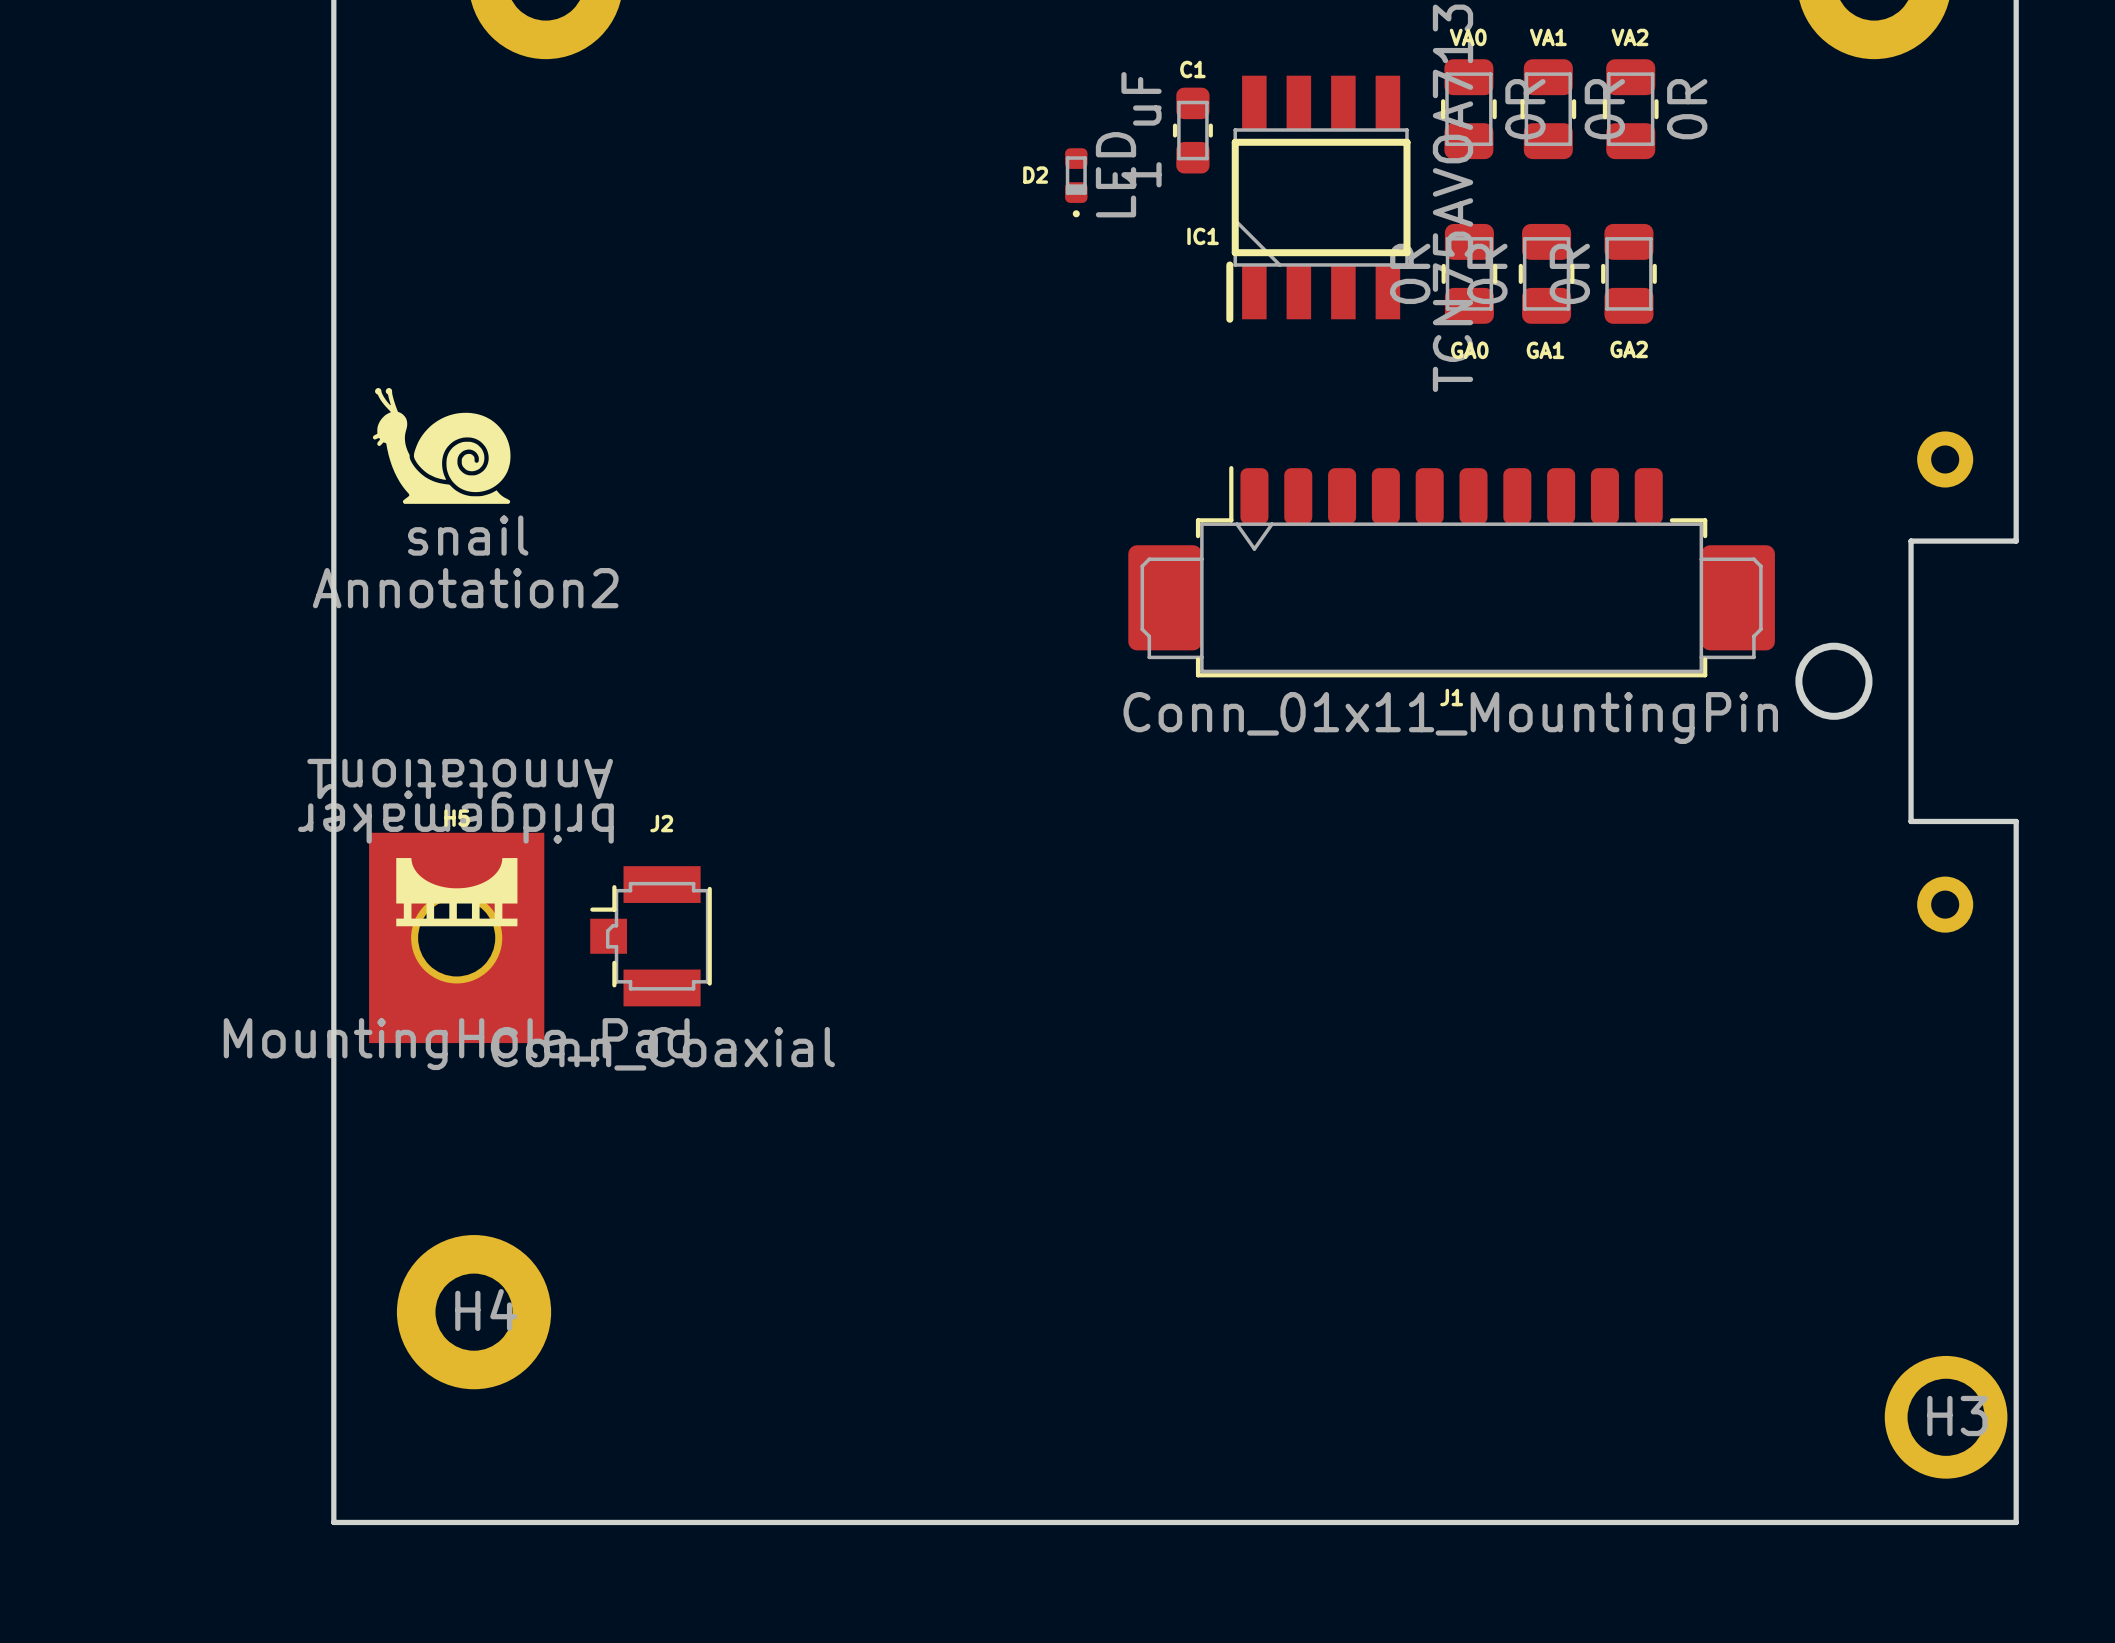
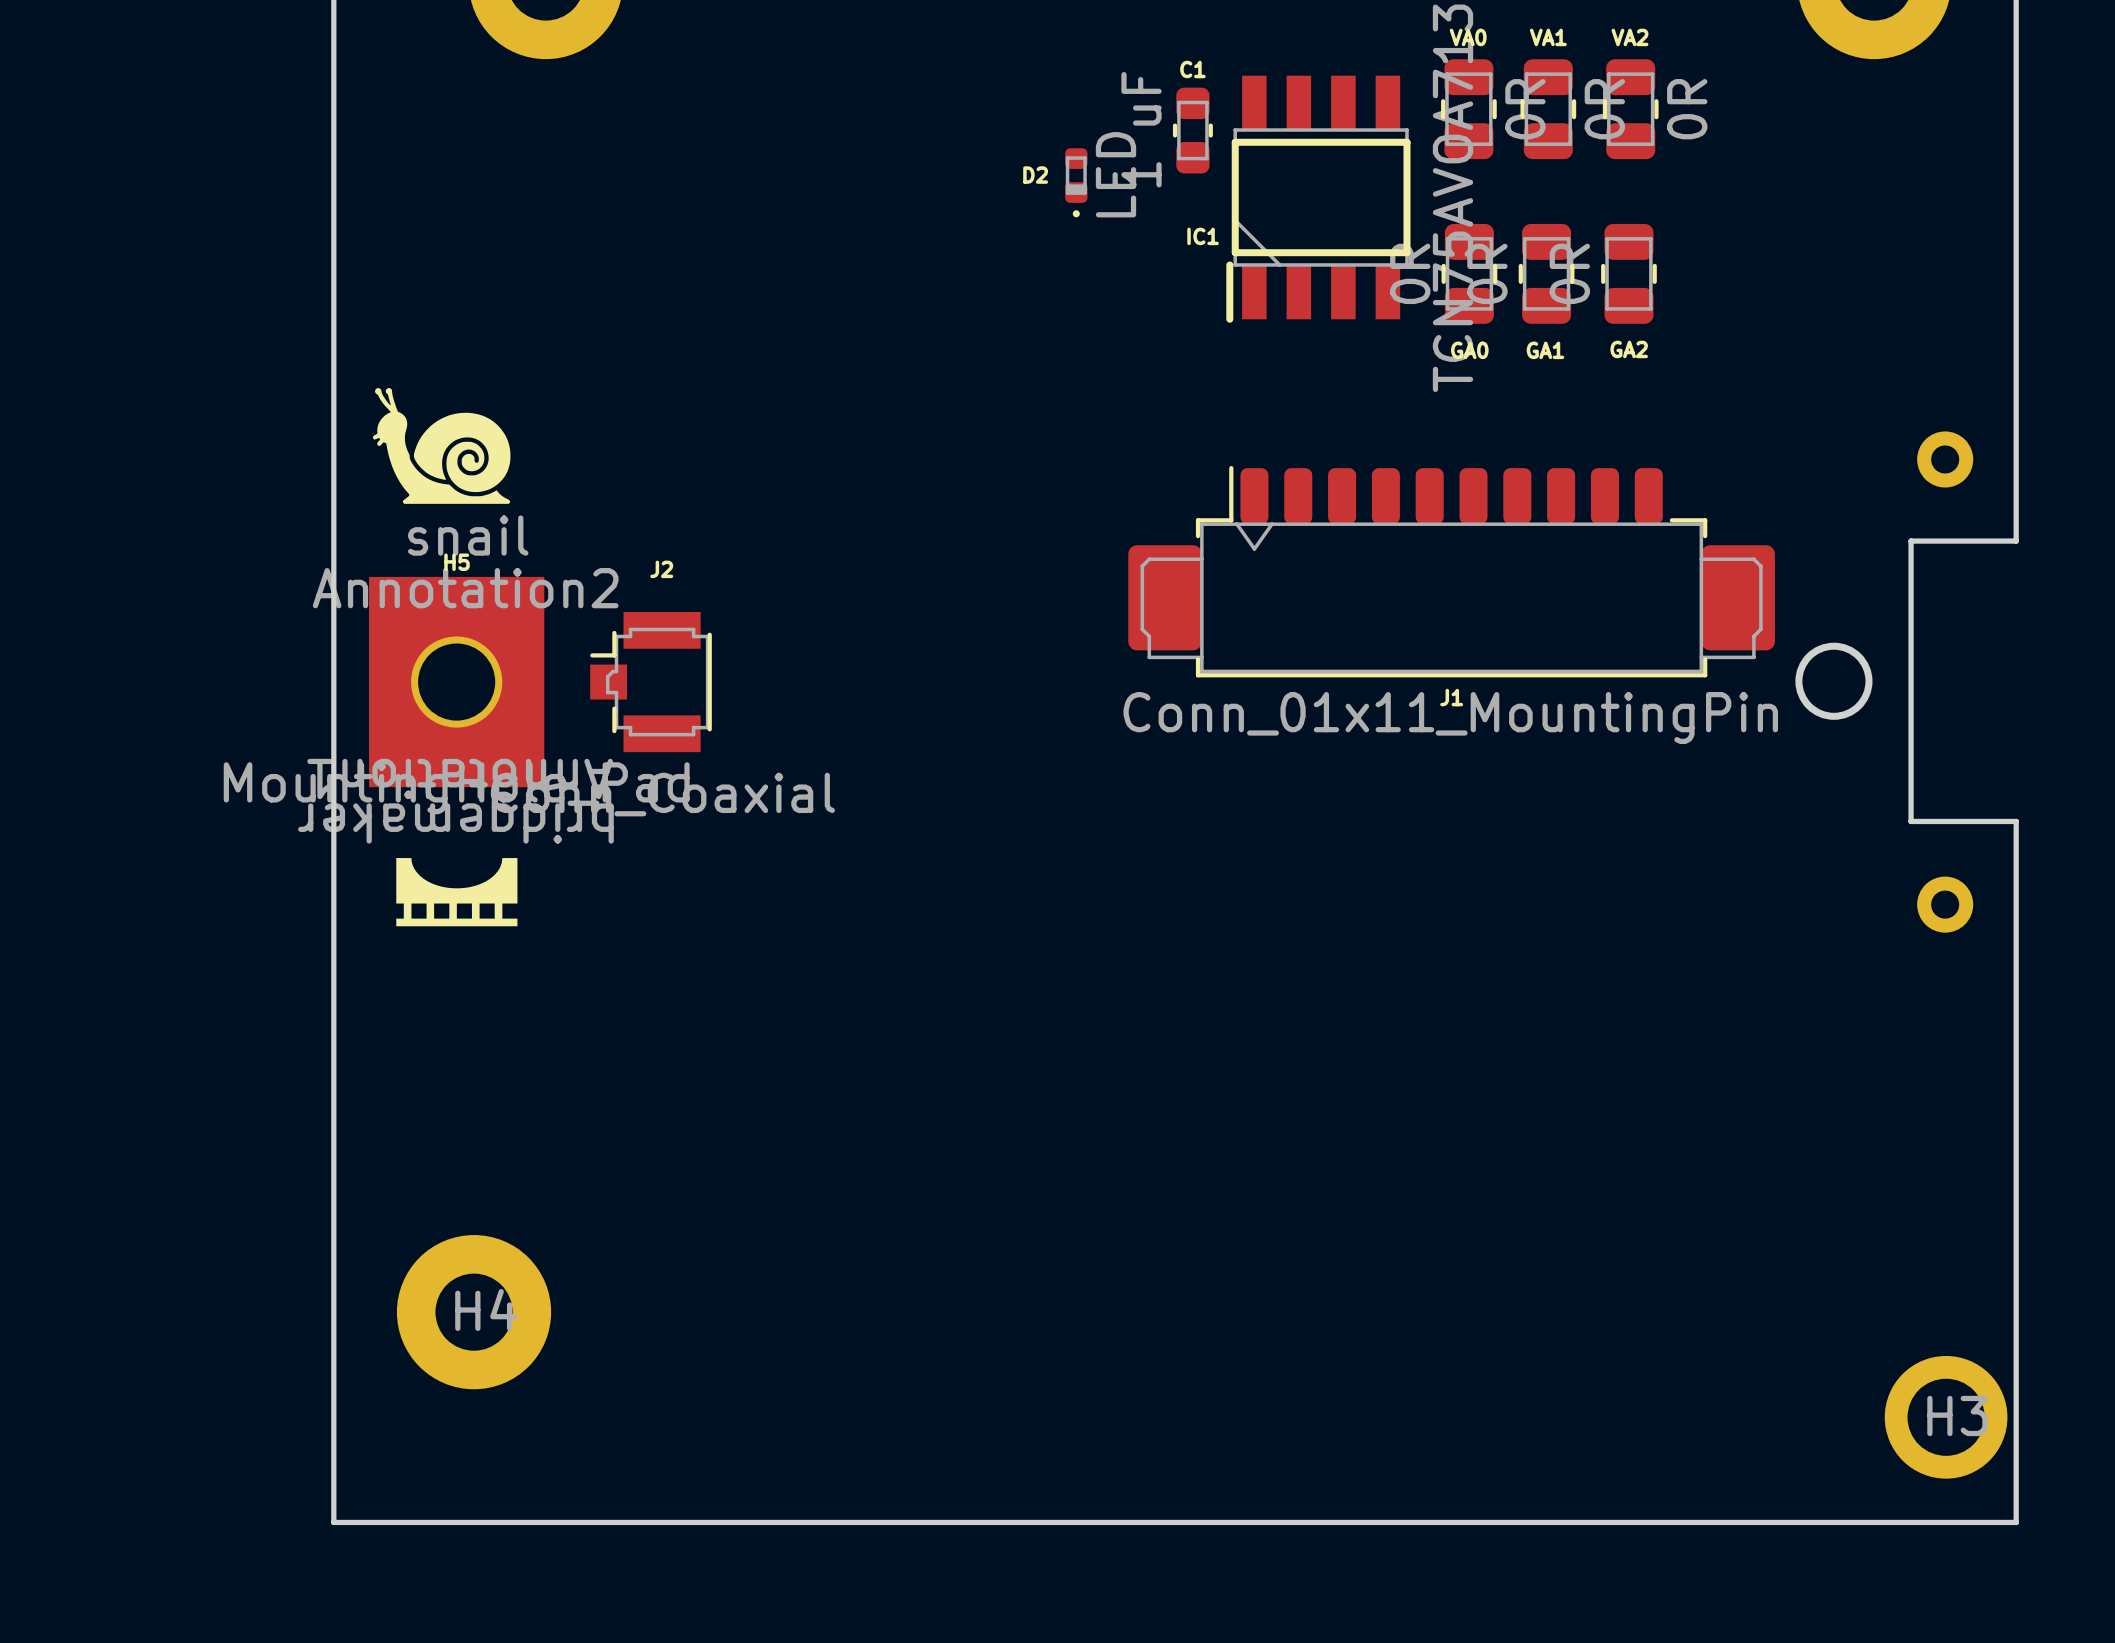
J2 position: (651, 936) -> (651, 682)
H5 position: (456, 937) -> (456, 682)

